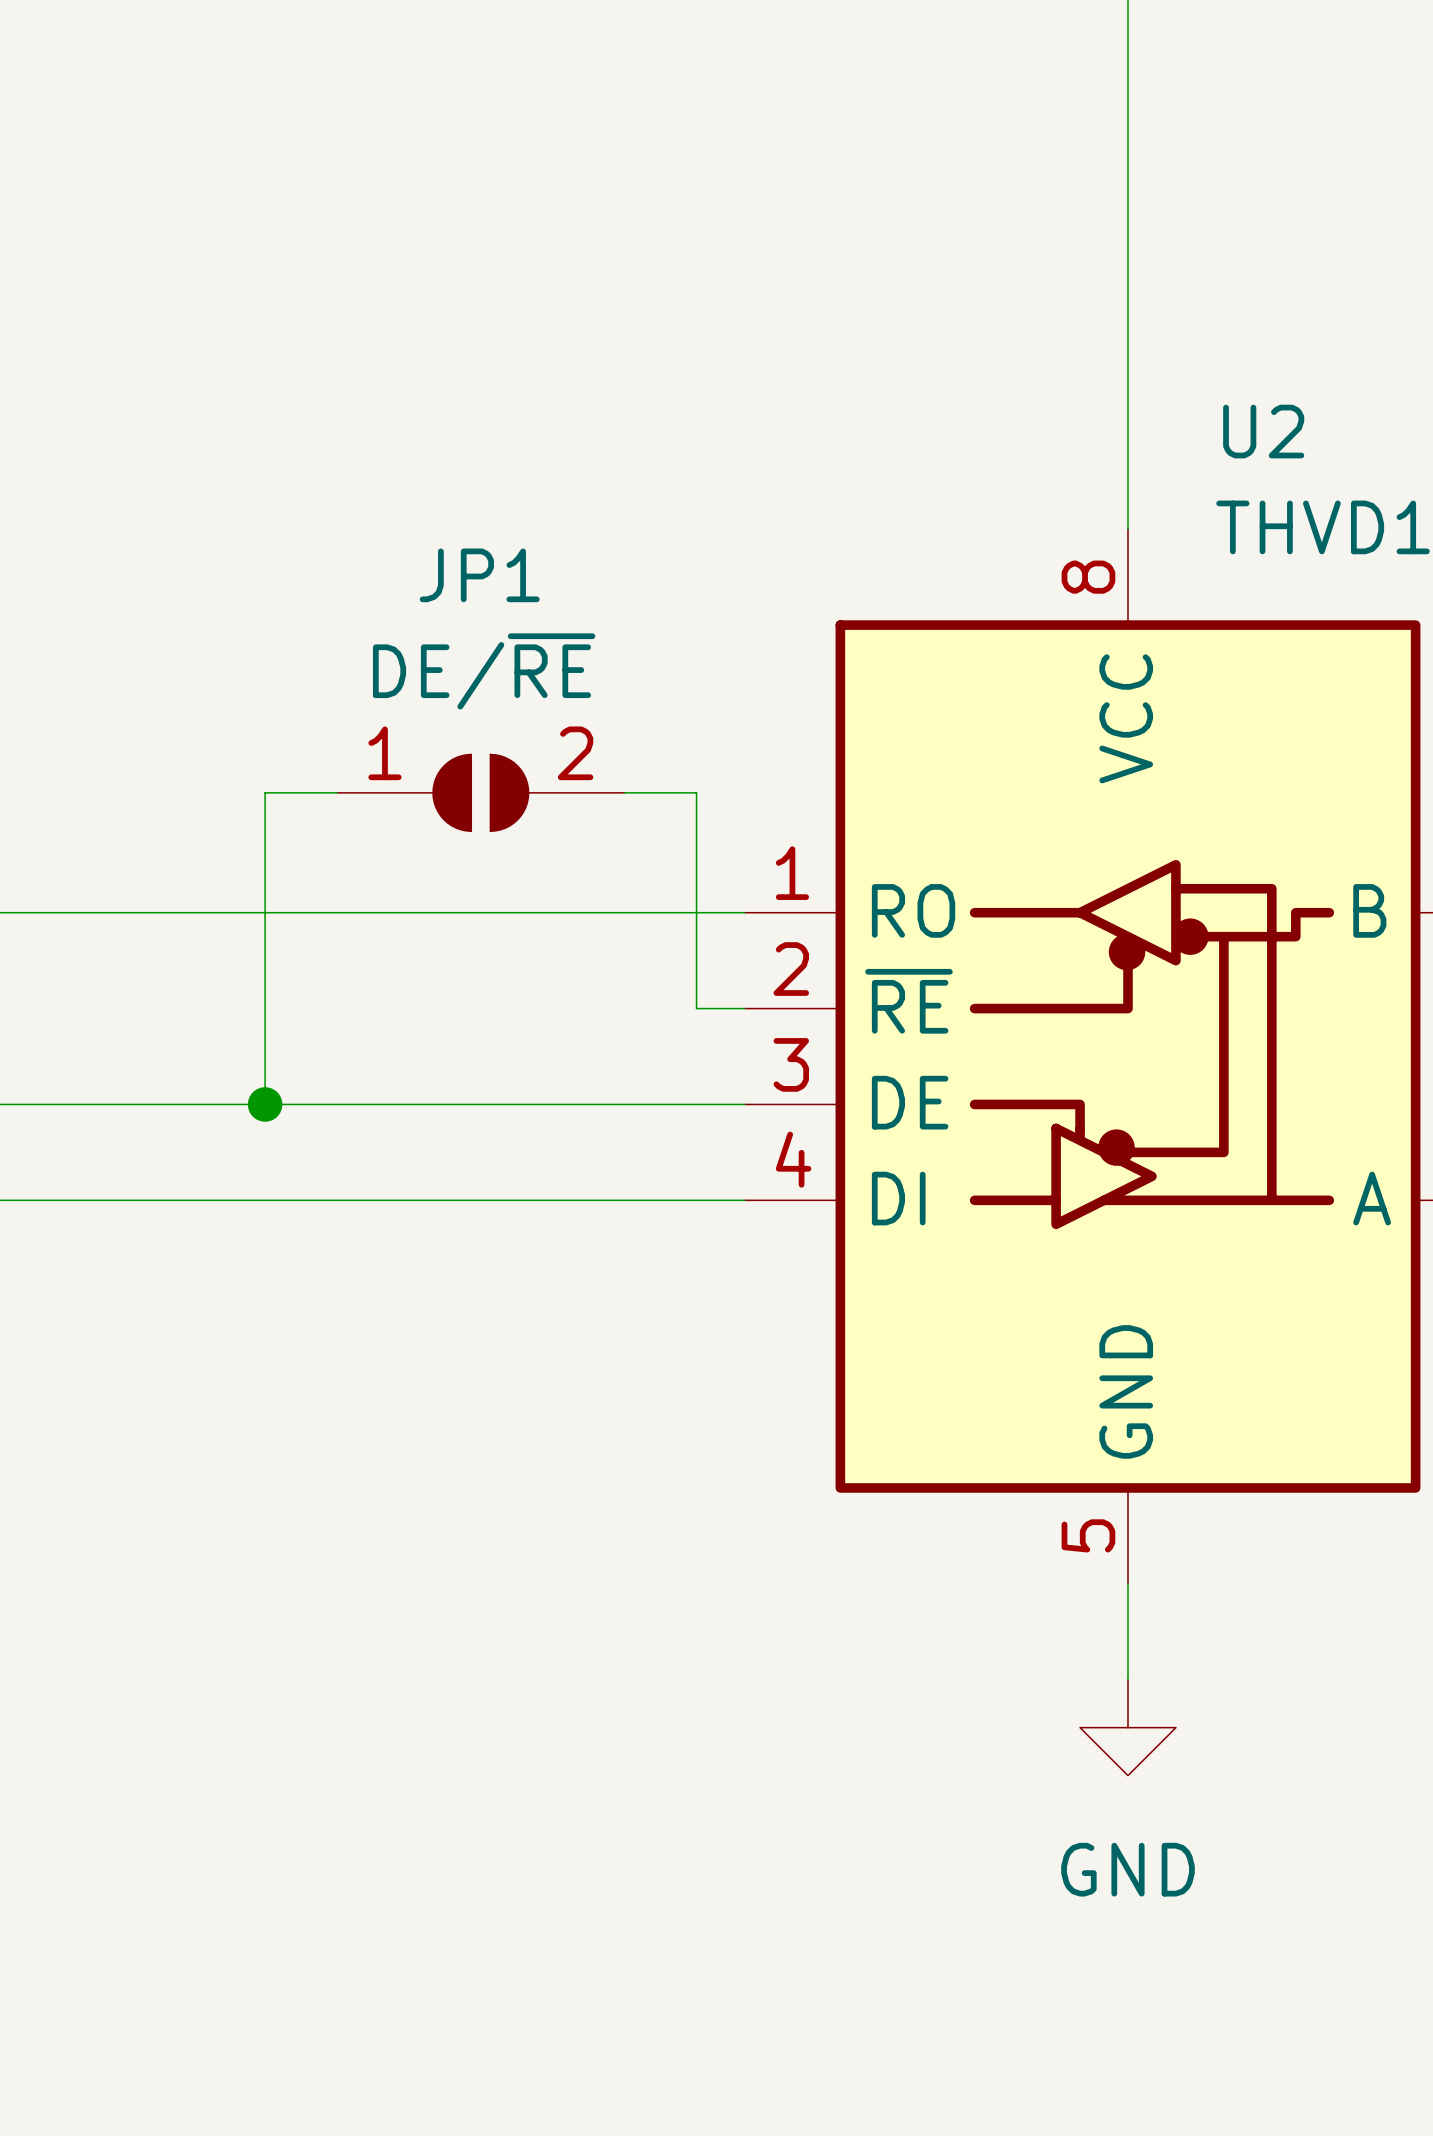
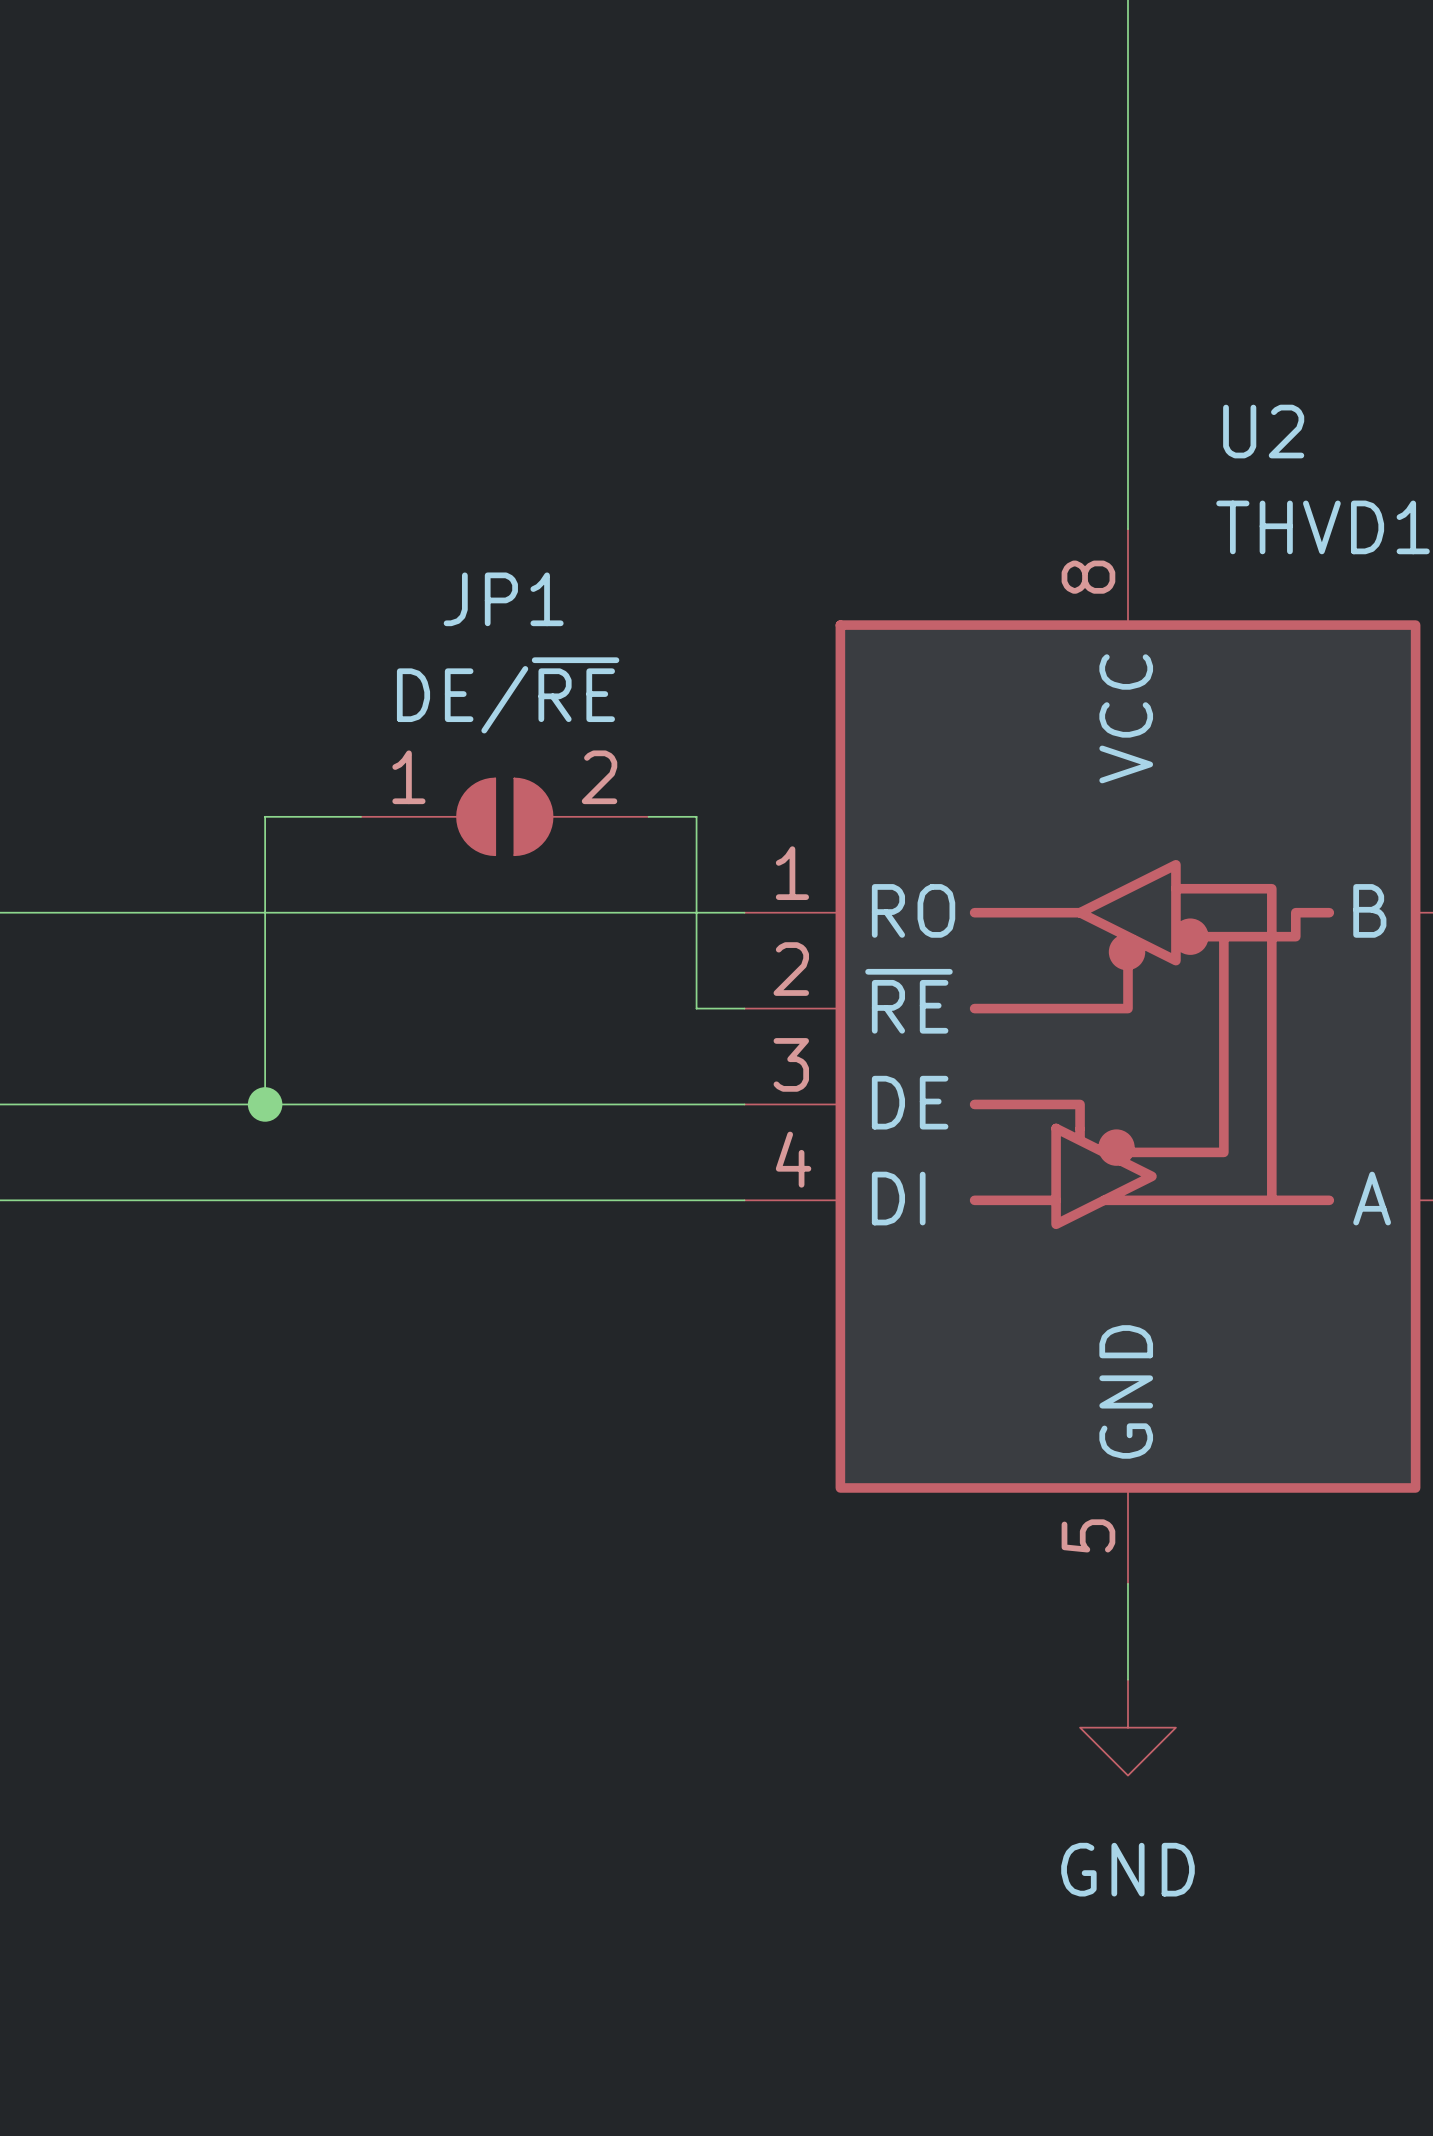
wire: (337, 792) (265, 792) (265, 816) -> (360, 816) (265, 816)
JP1 position: (480, 792) -> (504, 816)
wire: (624, 792) (696, 792) (696, 816) -> (648, 816) (696, 816)

